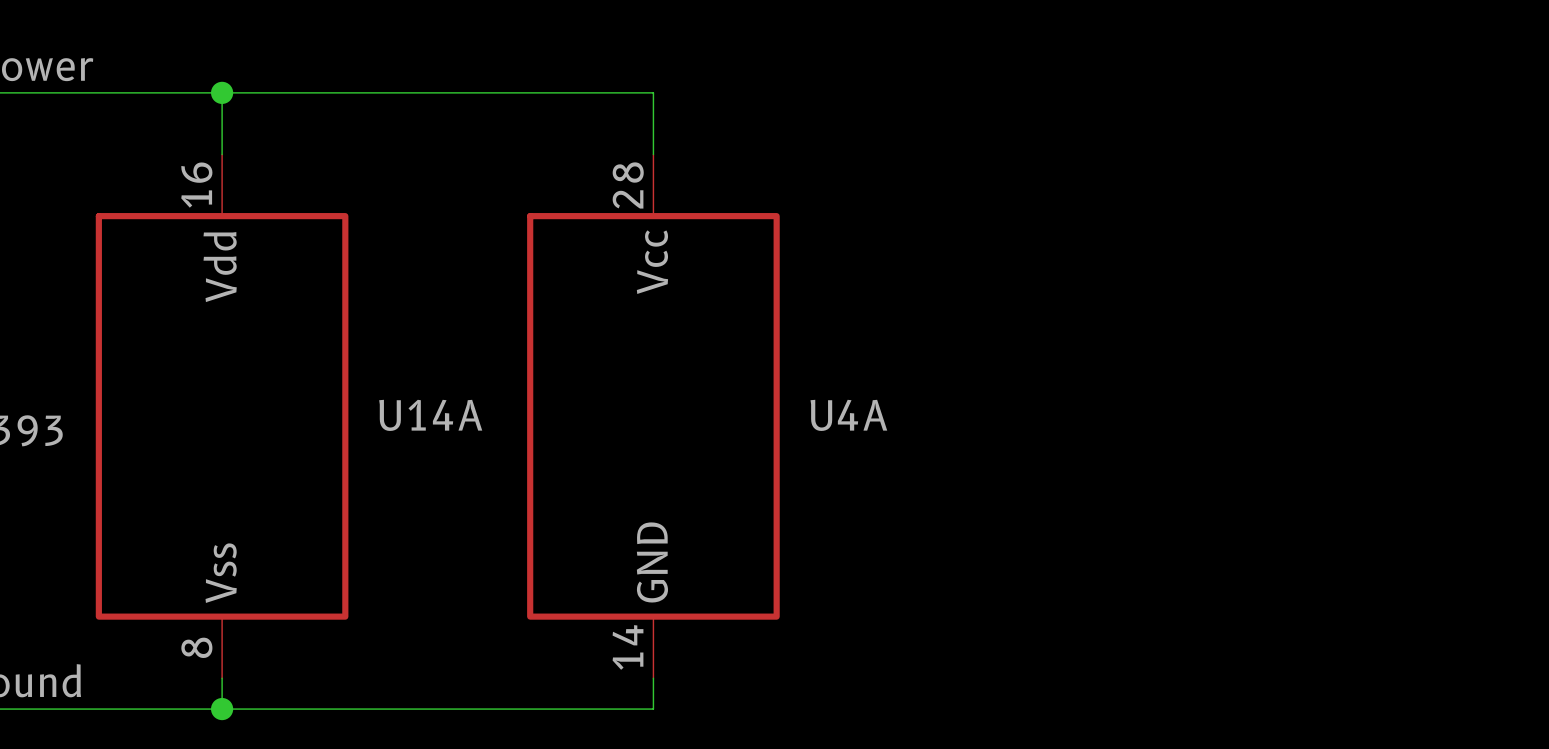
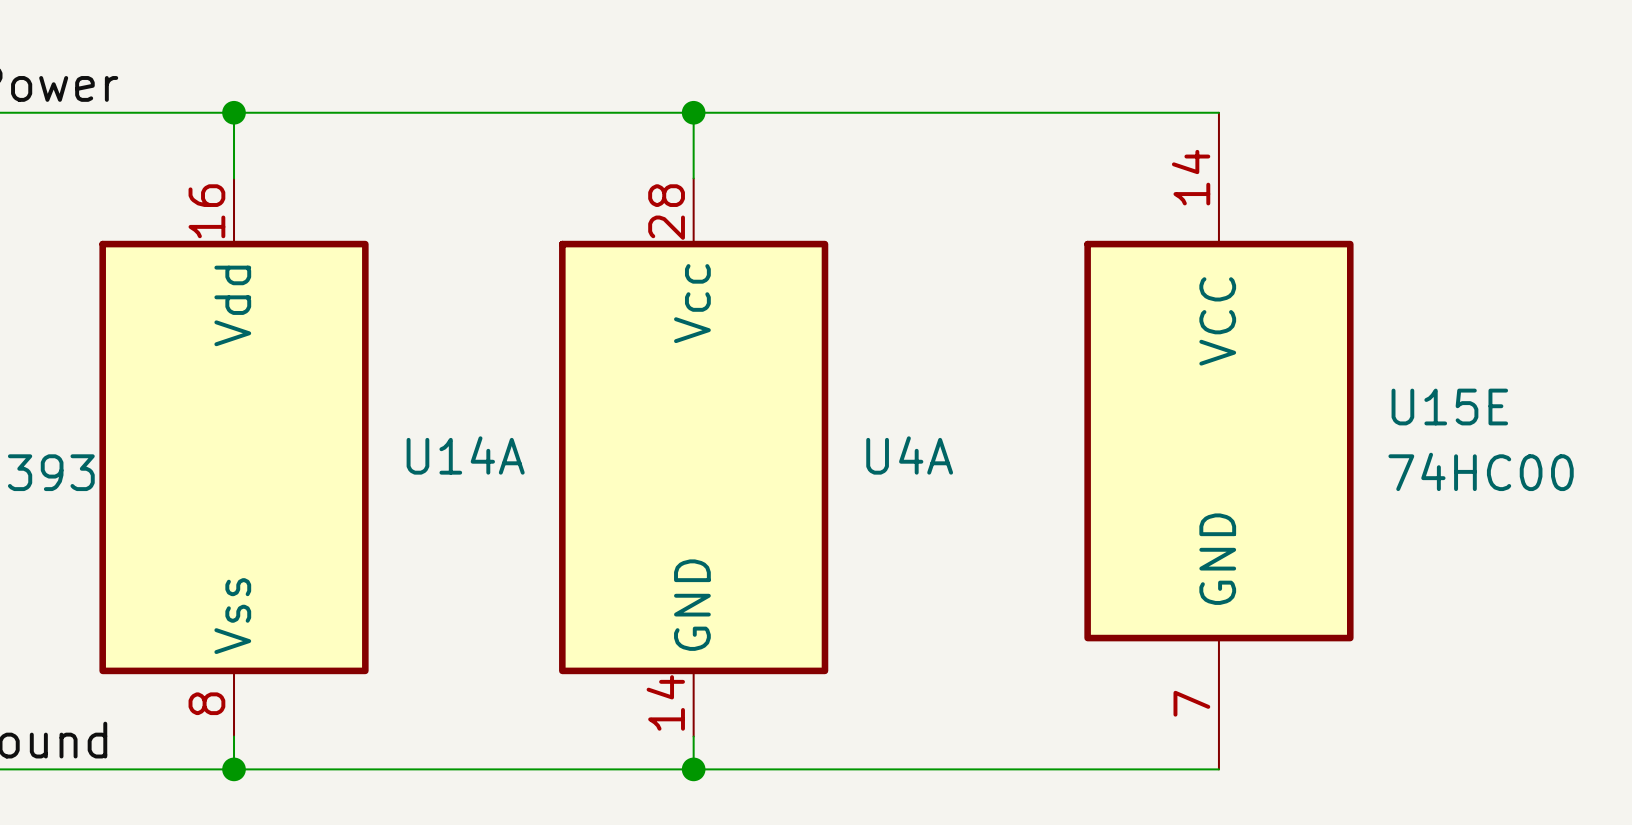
wire: none -> (693, 112) (1218, 112)
junction: none -> (693, 112)
U15E: none -> 74HC00 (1218, 441)
wire: none -> (693, 769) (1218, 769)
junction: none -> (693, 769)

